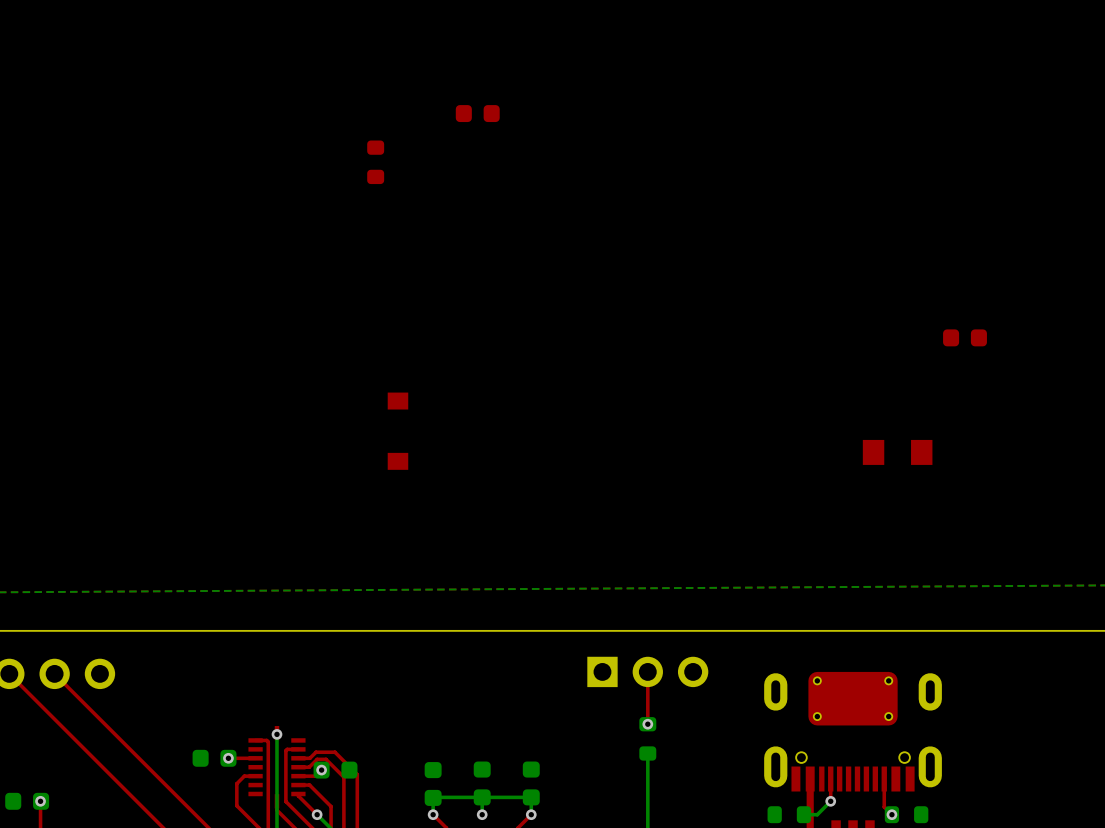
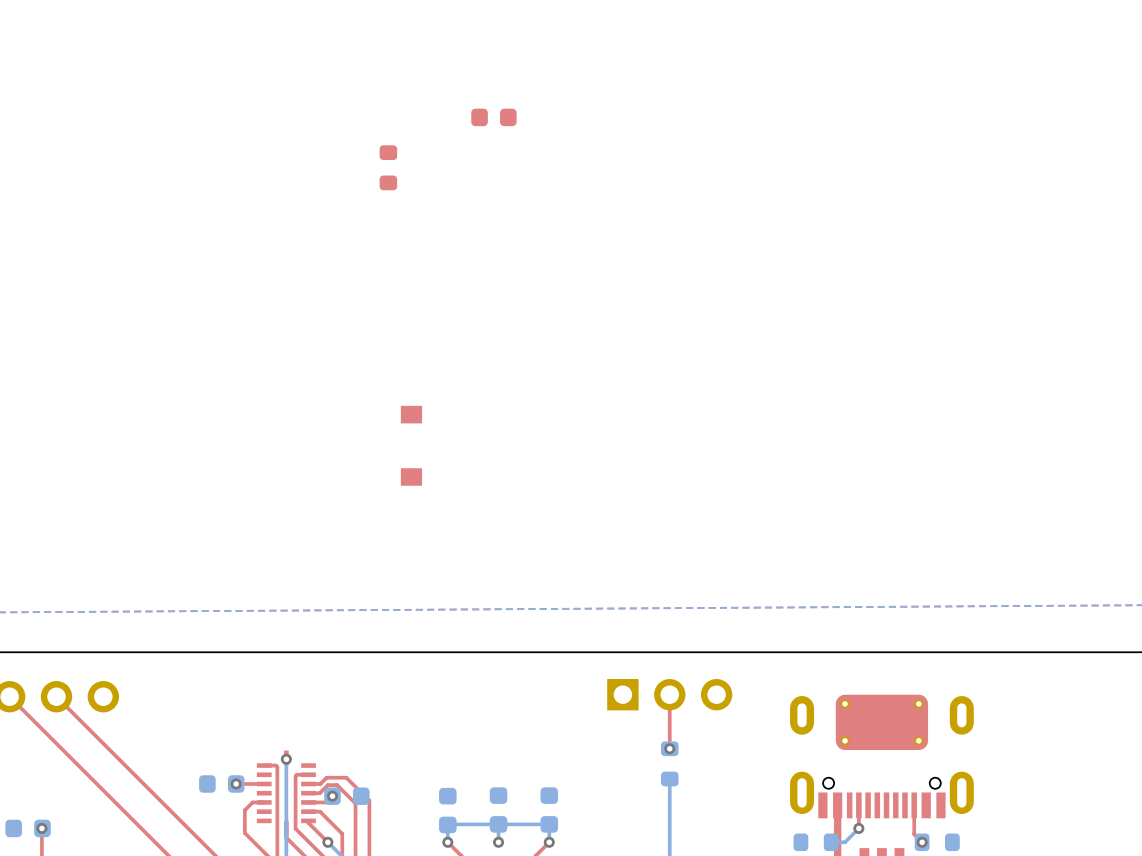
part: (965, 337) -> none
part: (897, 452) -> none

